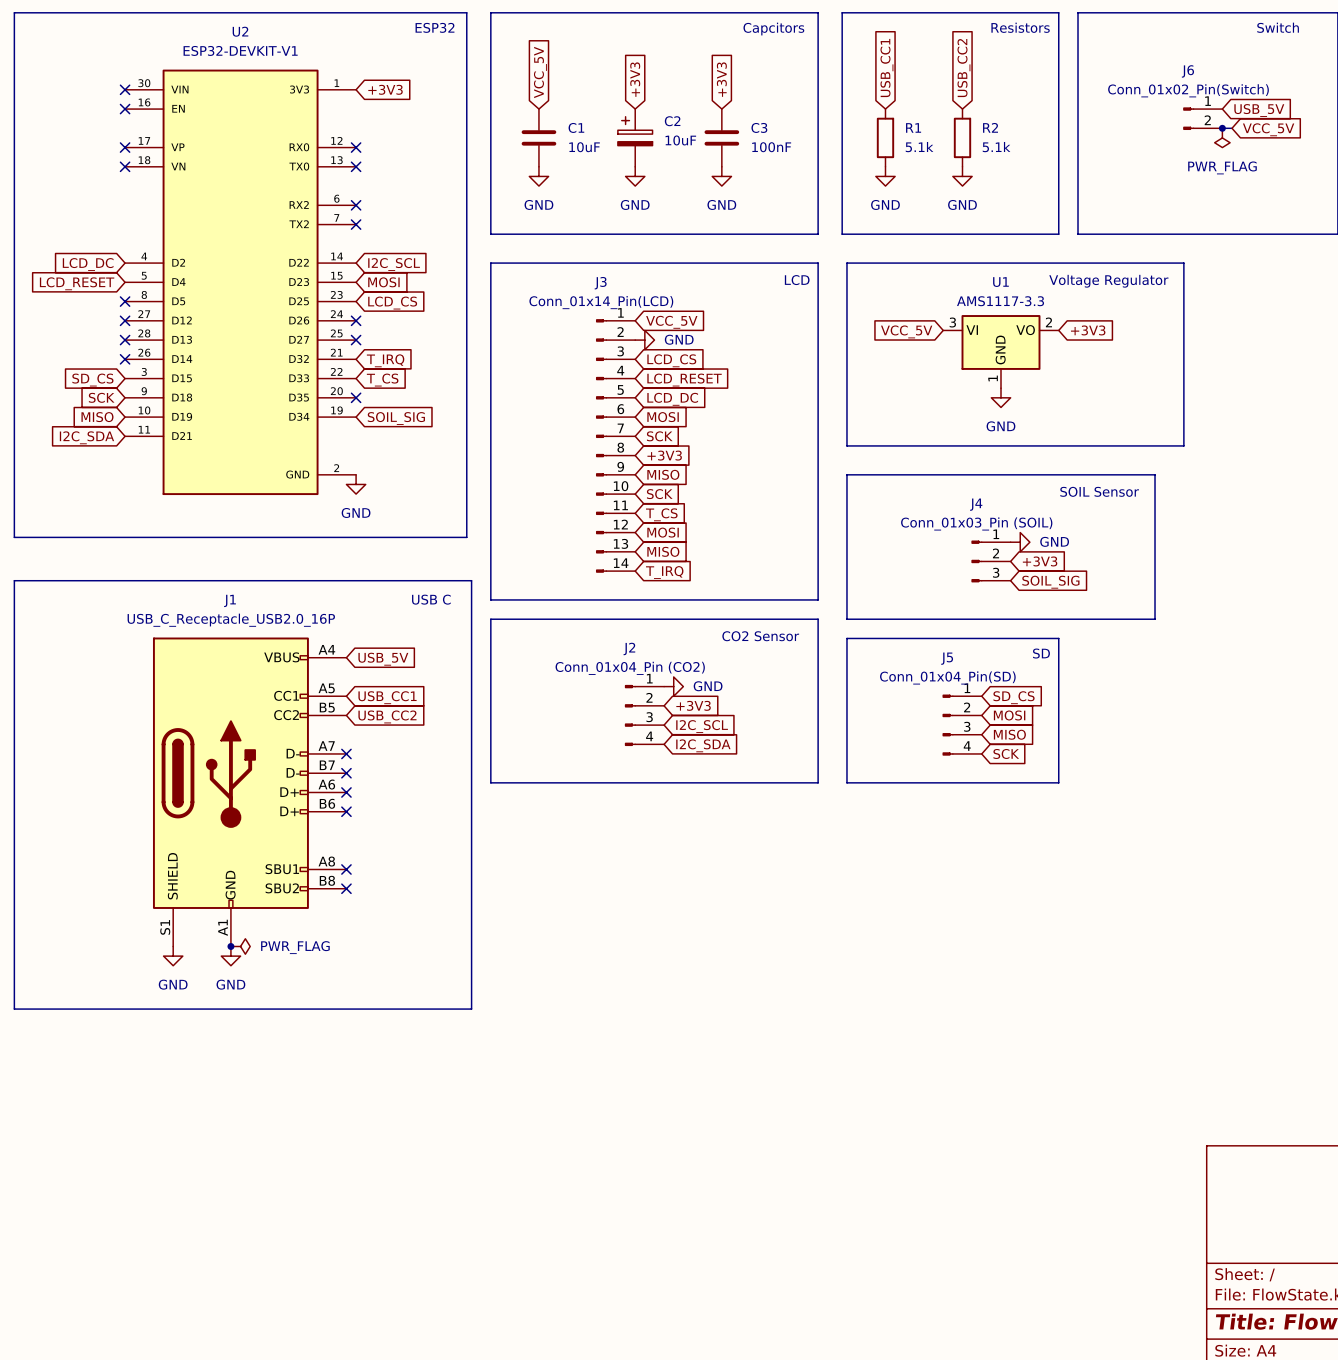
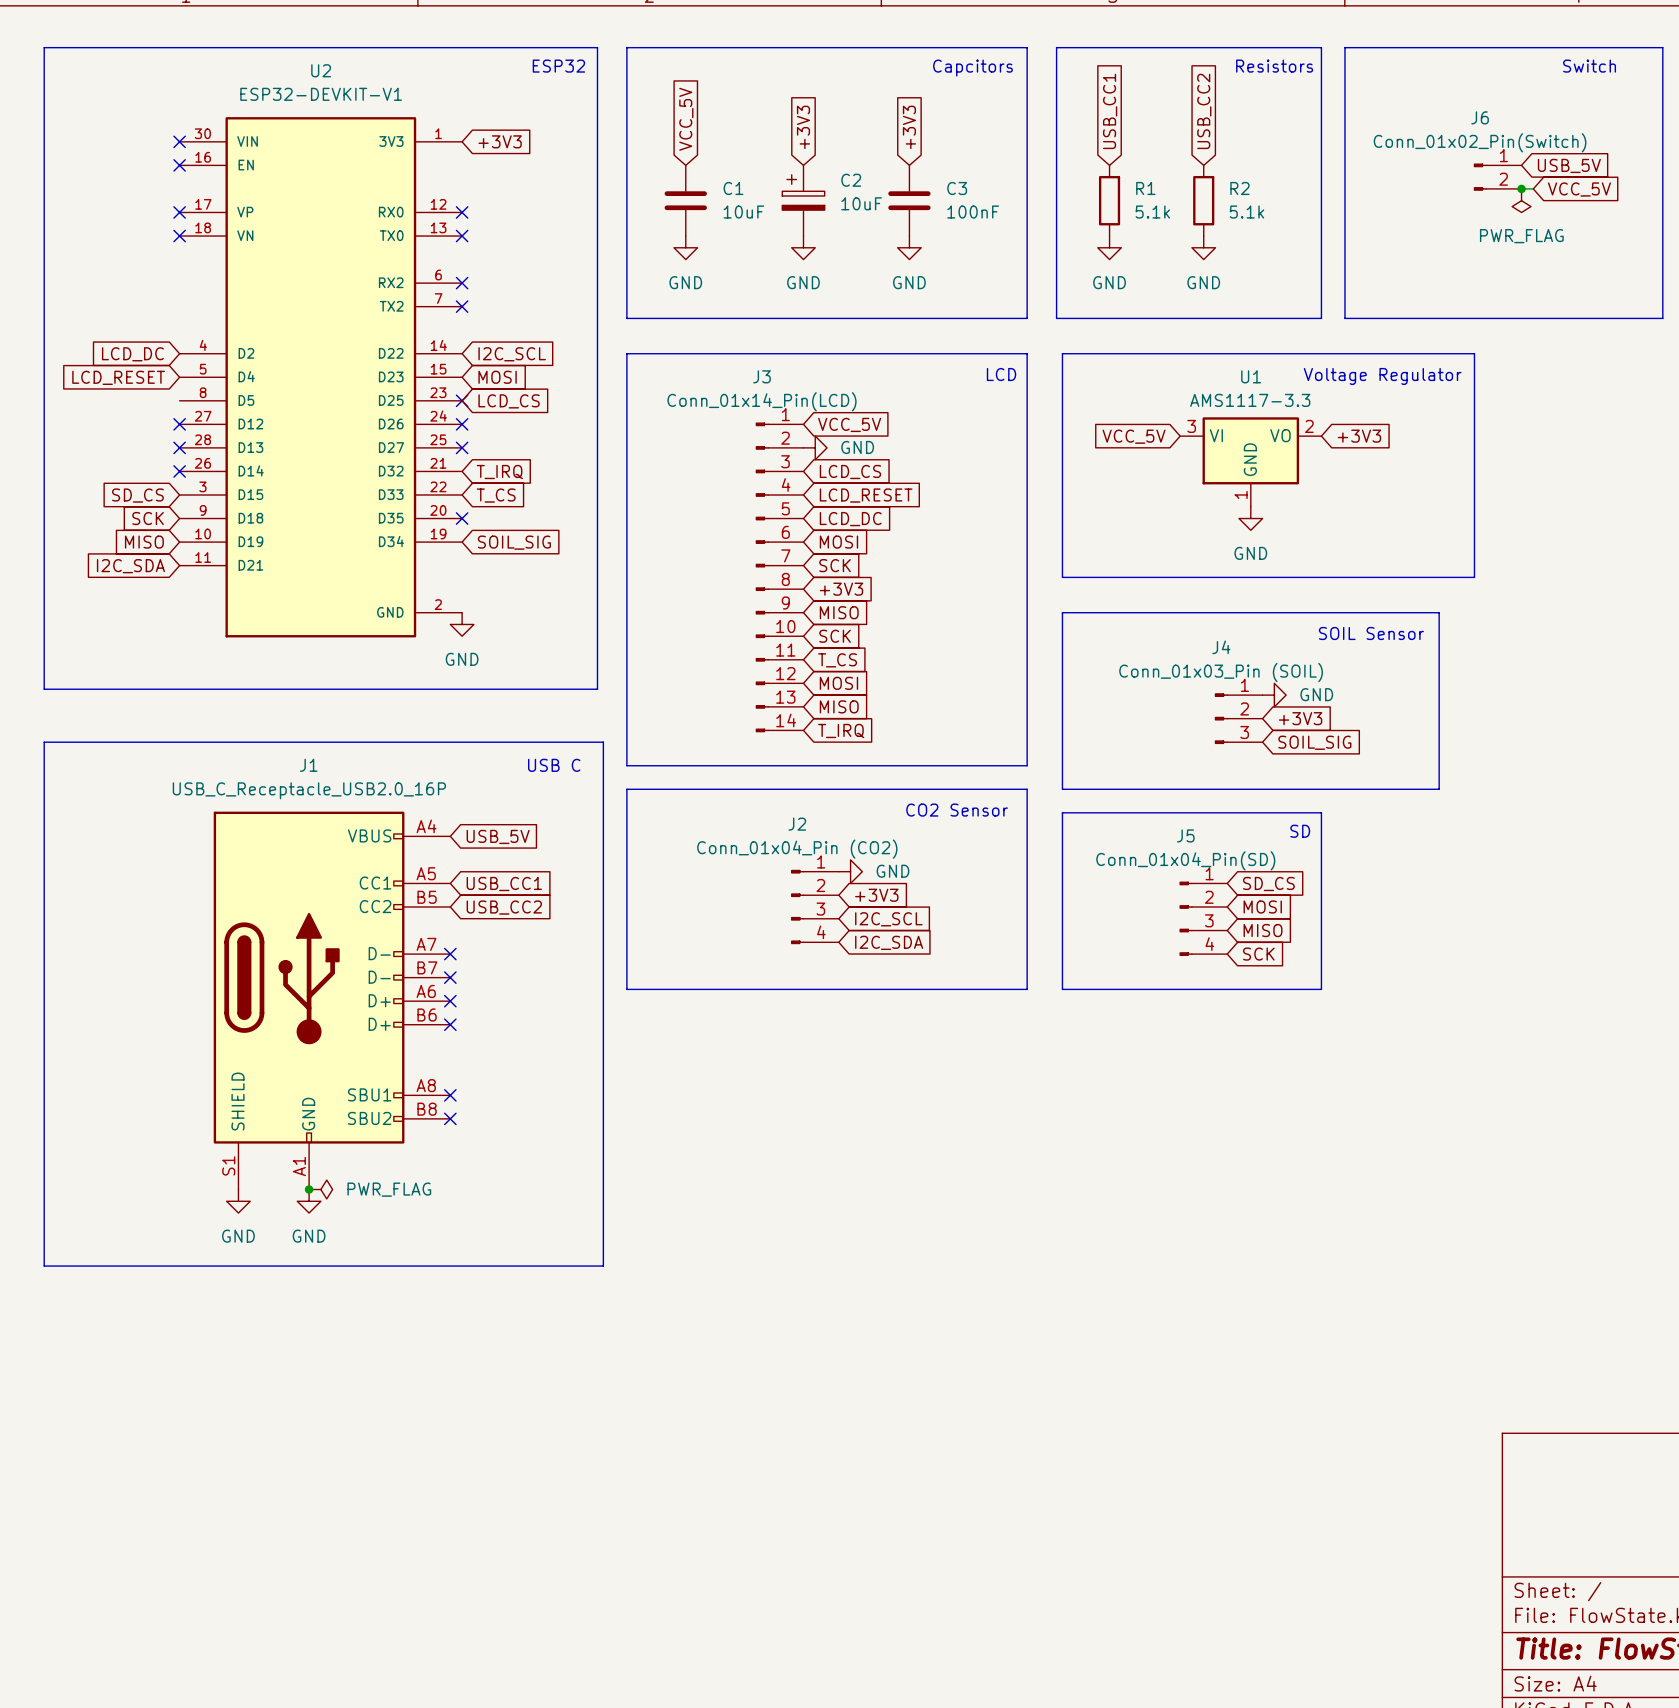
no-connect mark: (125, 301) -> none
no-connect mark: none -> (462, 400)

